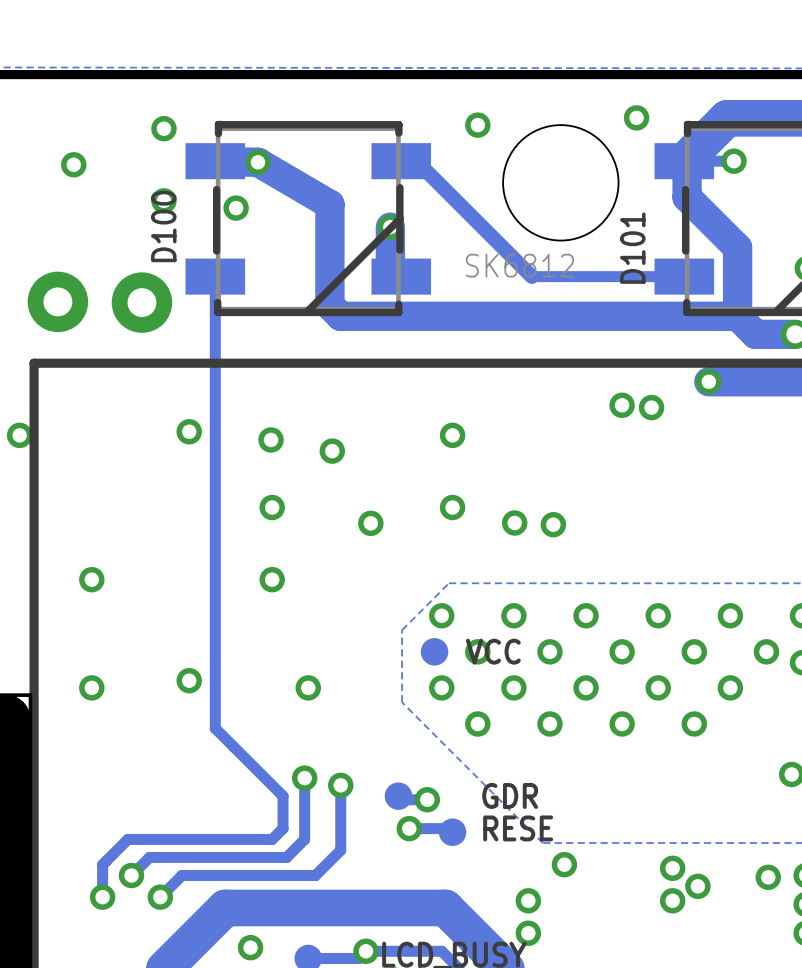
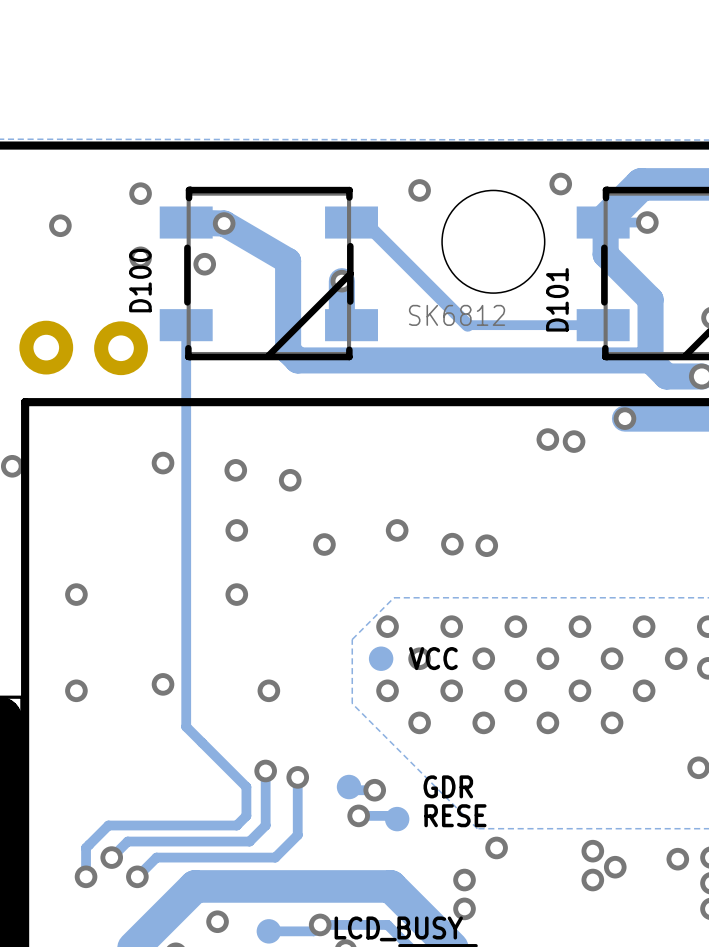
via: (452, 435) -> none

